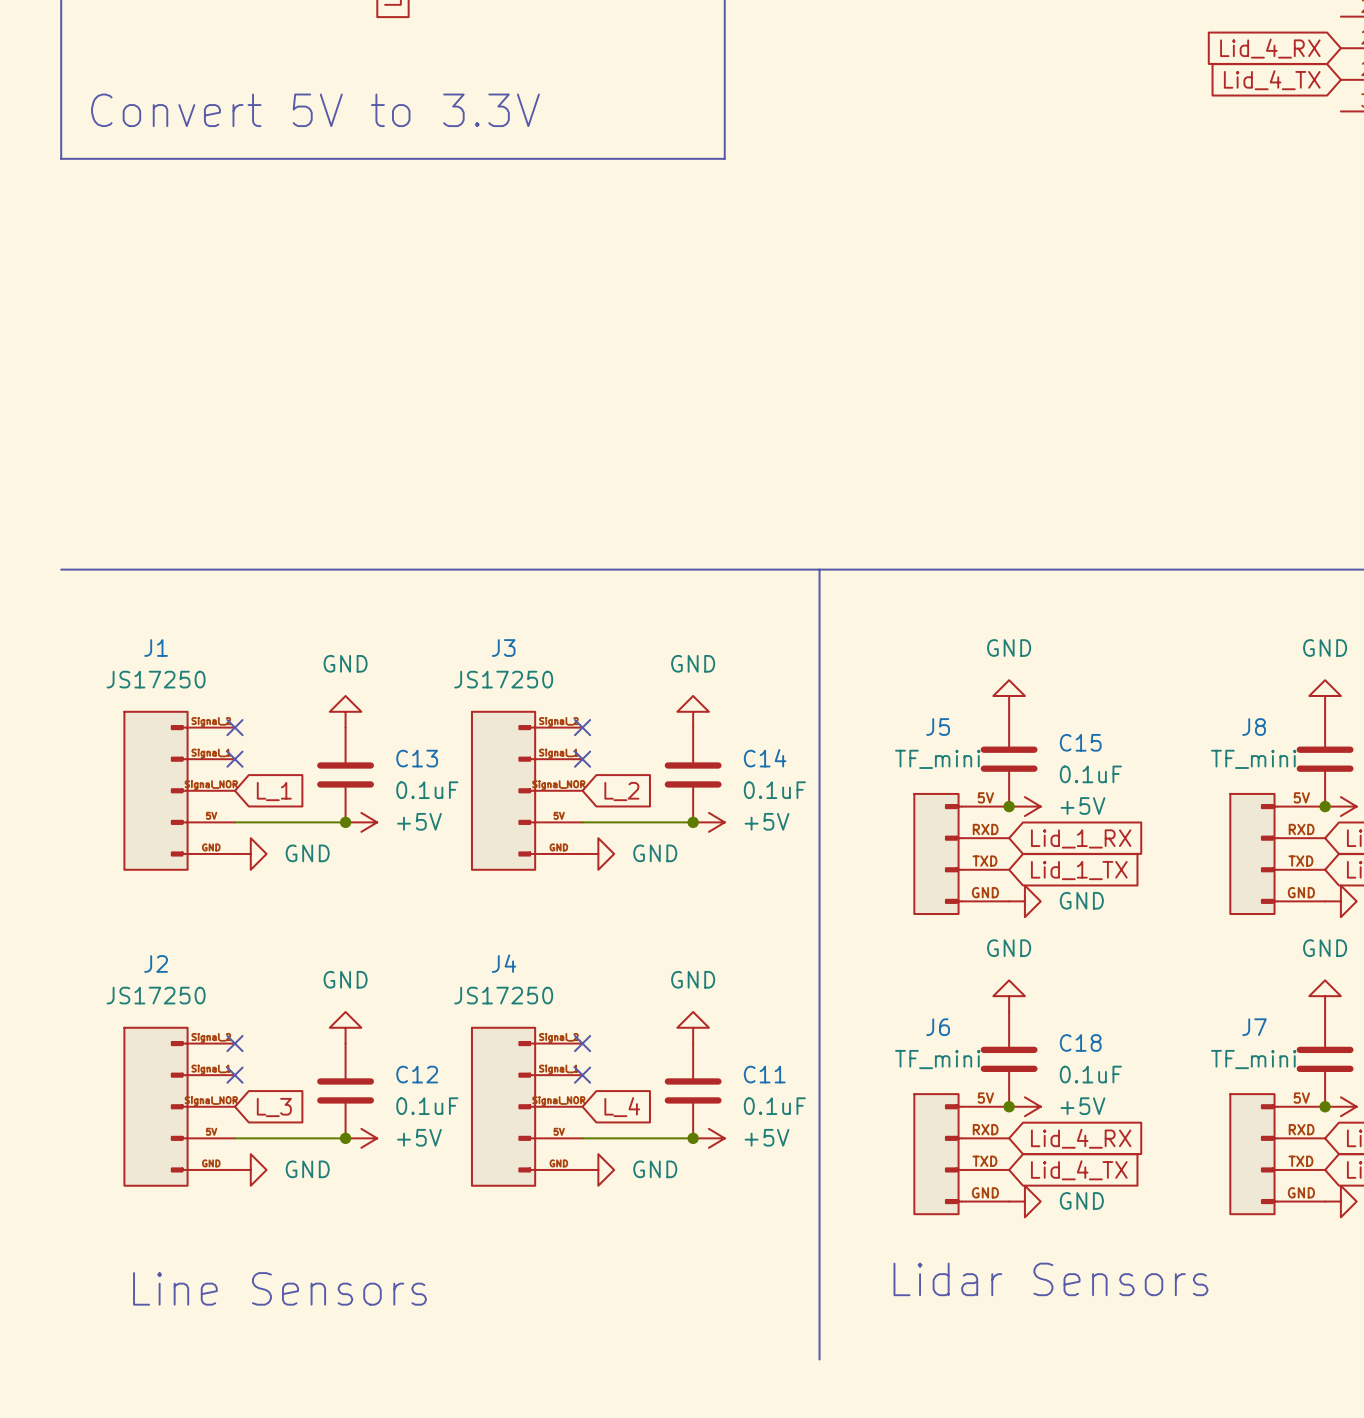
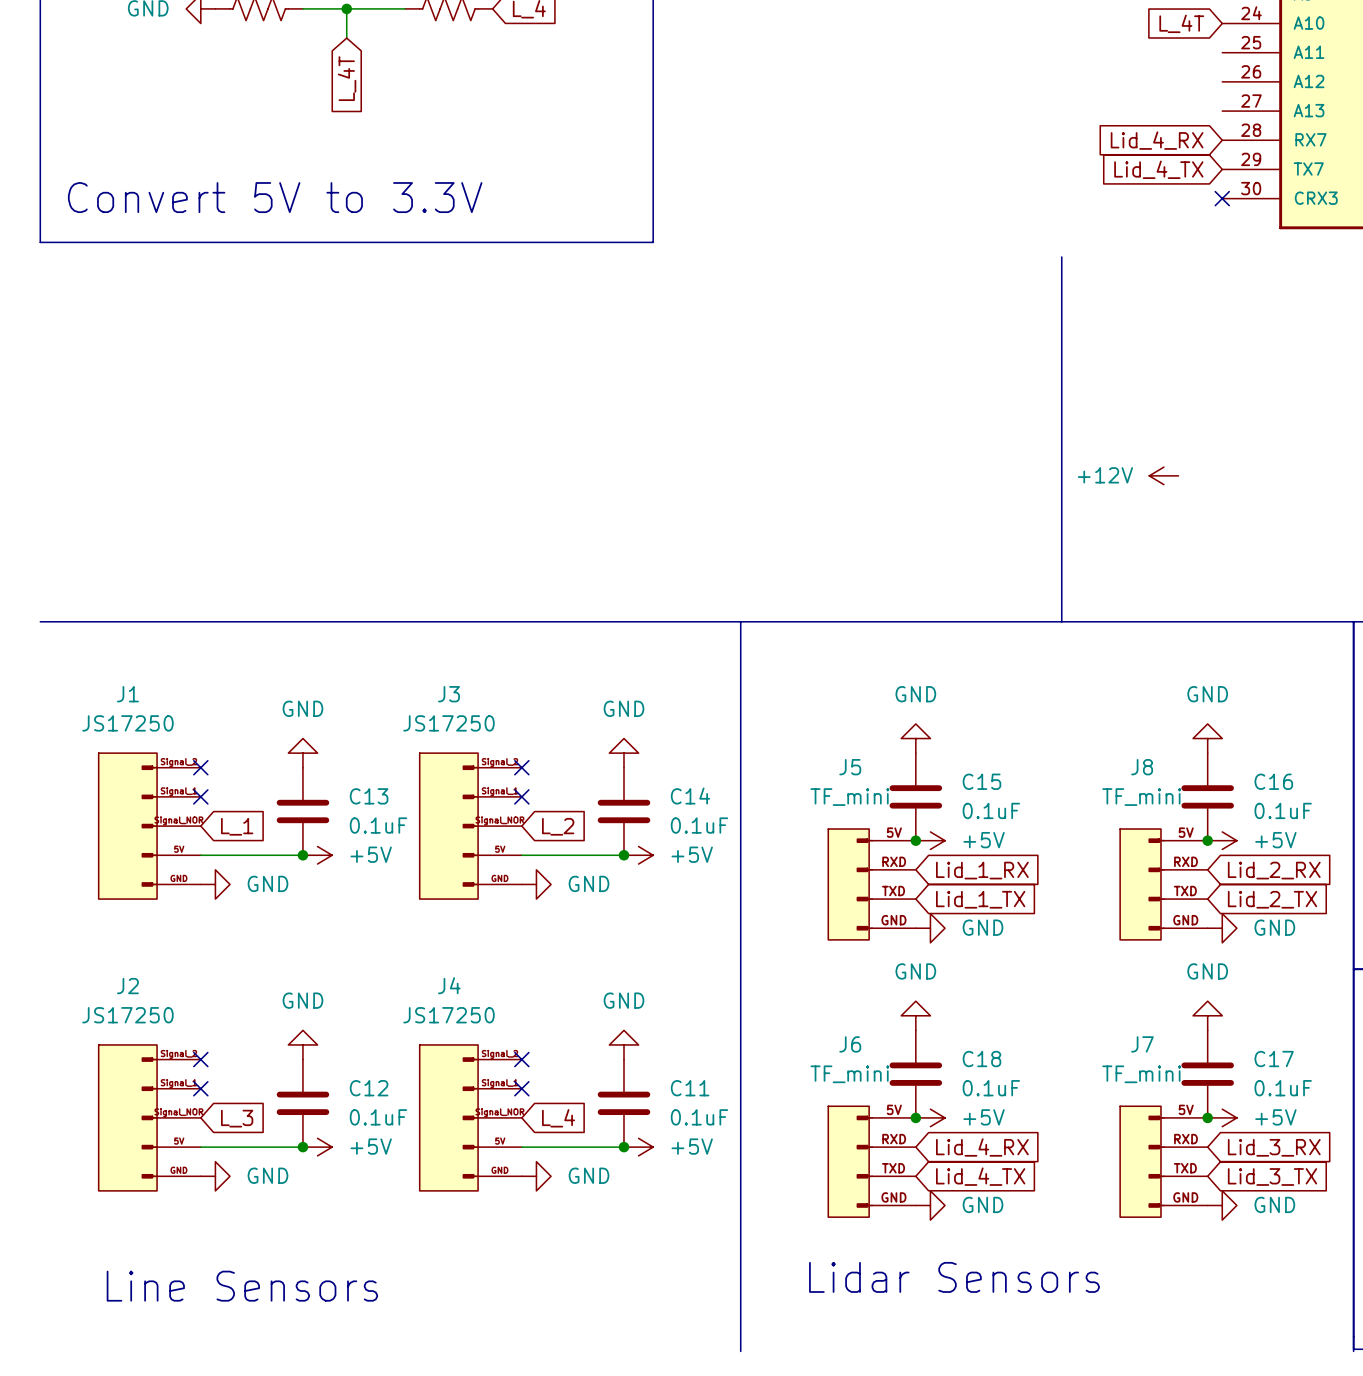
no-connect mark: none -> (1222, 198)
line: none -> (1061, 256) (1061, 621)
power symbol: none -> +12V (1163, 475)

